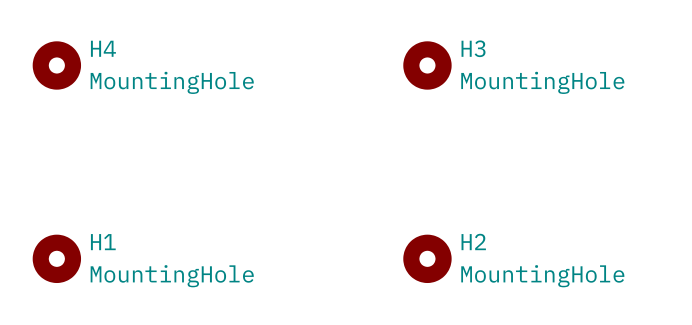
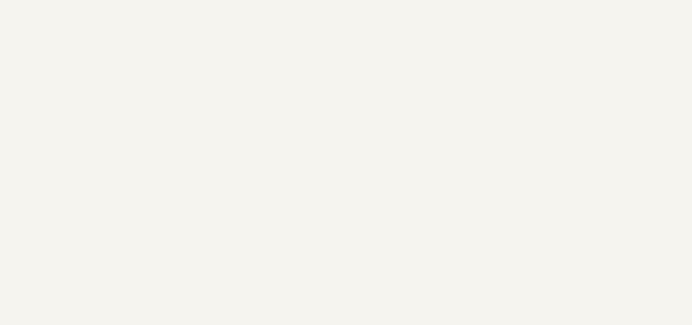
H4: MountingHole (56, 65) -> none
H3: MountingHole (427, 65) -> none
H1: MountingHole (56, 258) -> none
H2: MountingHole (427, 258) -> none

